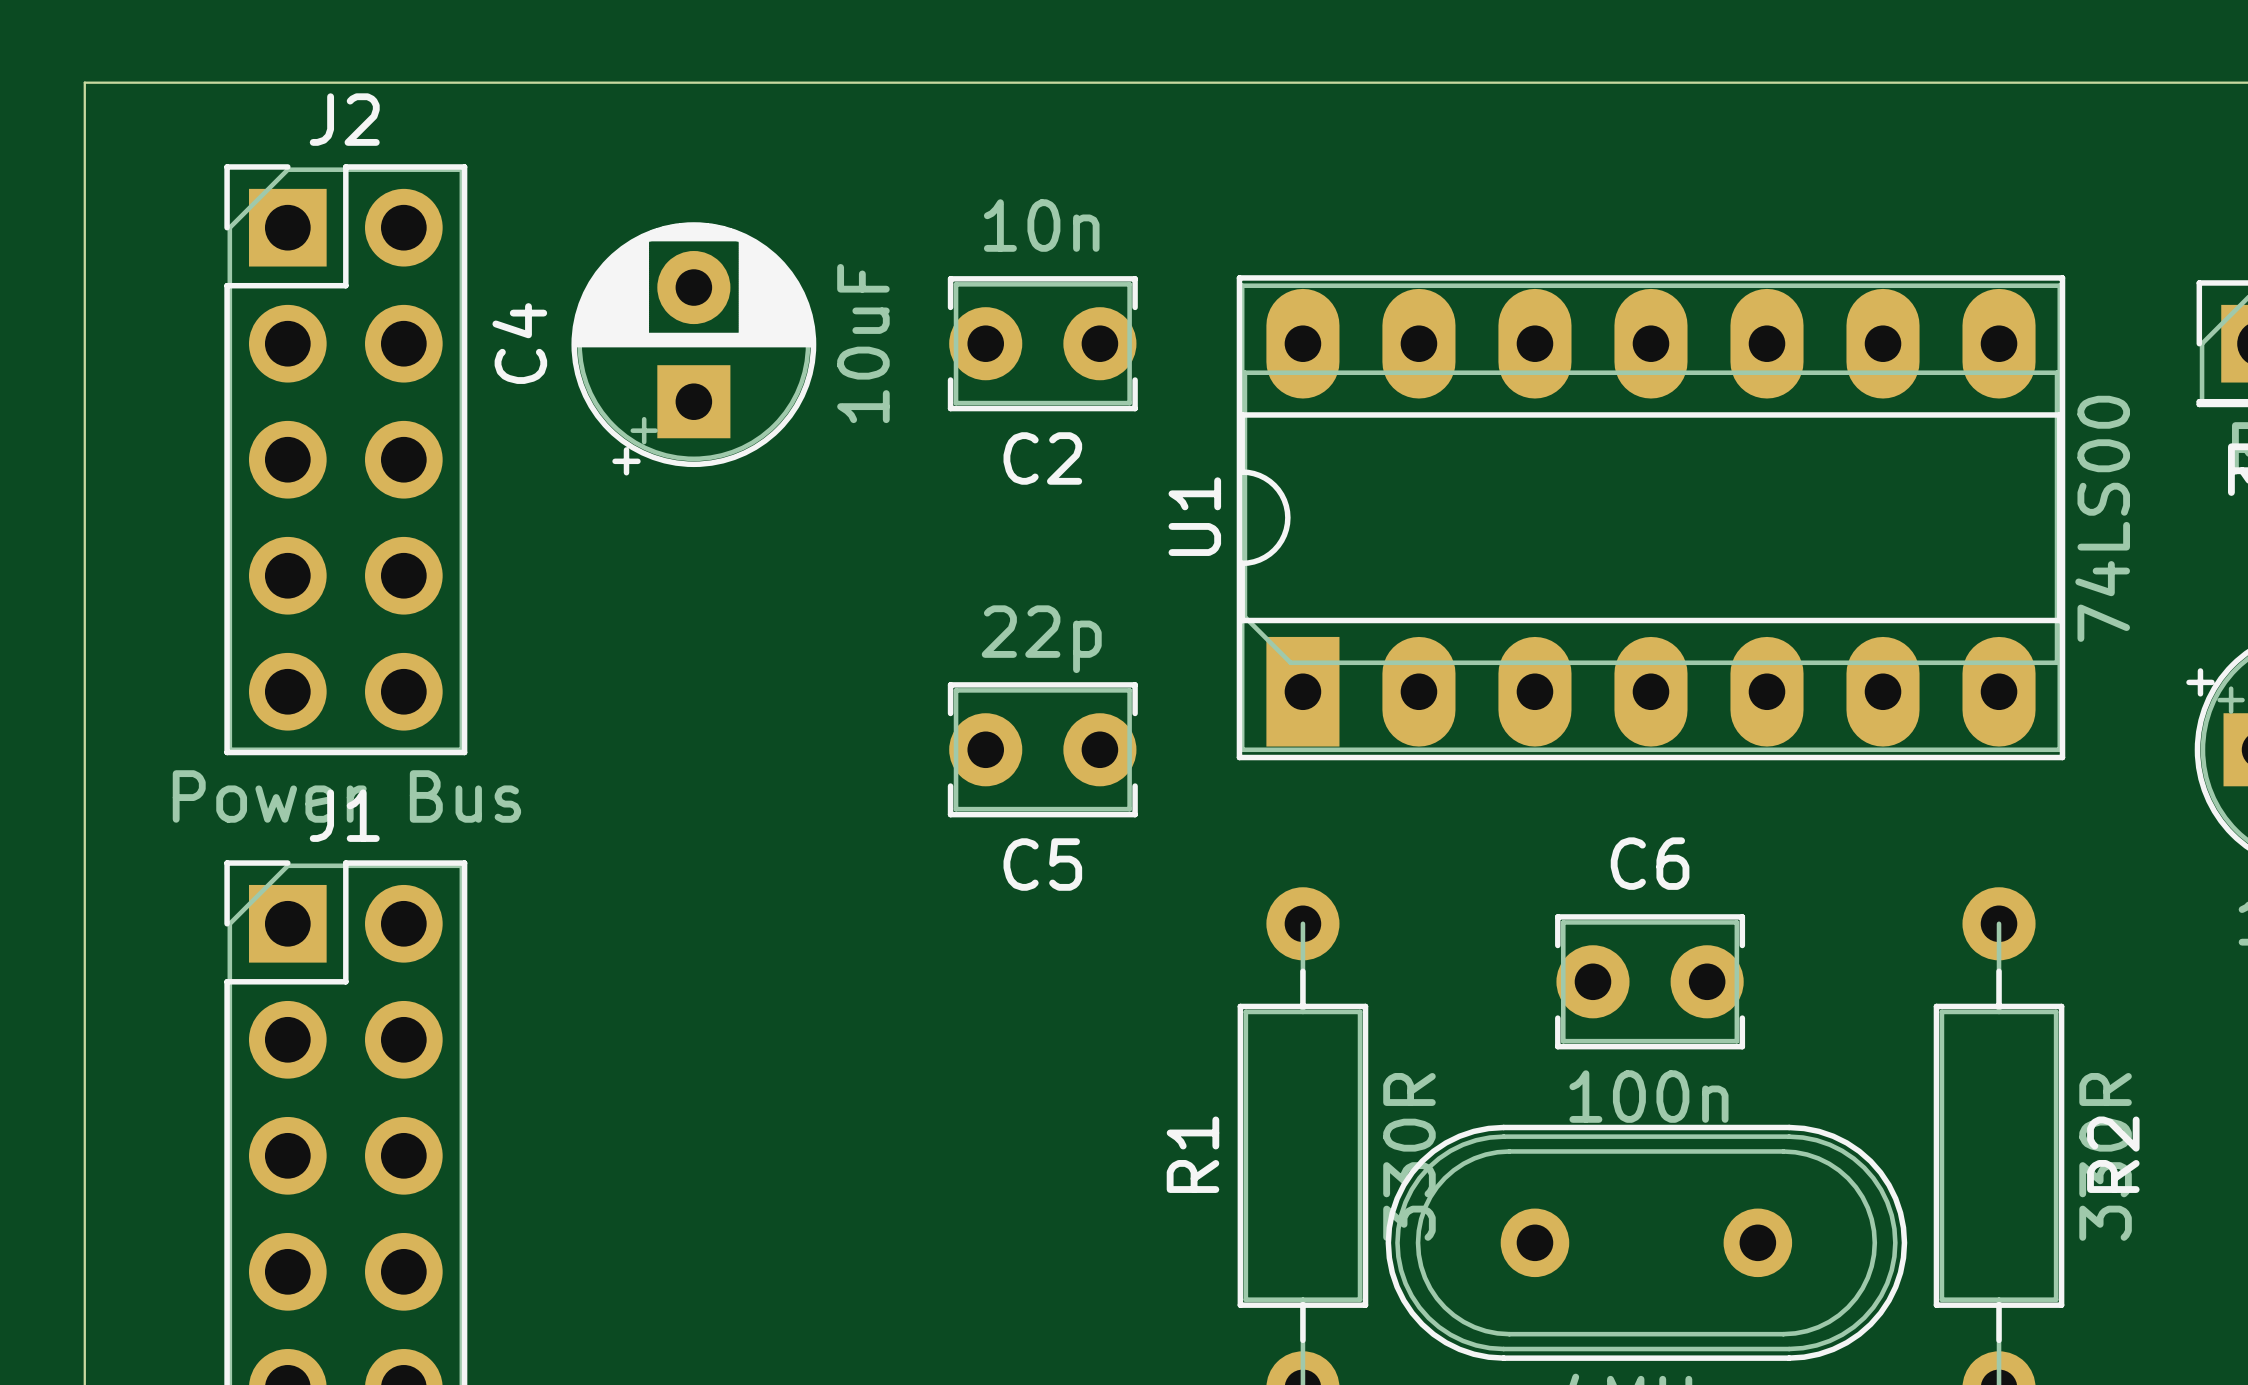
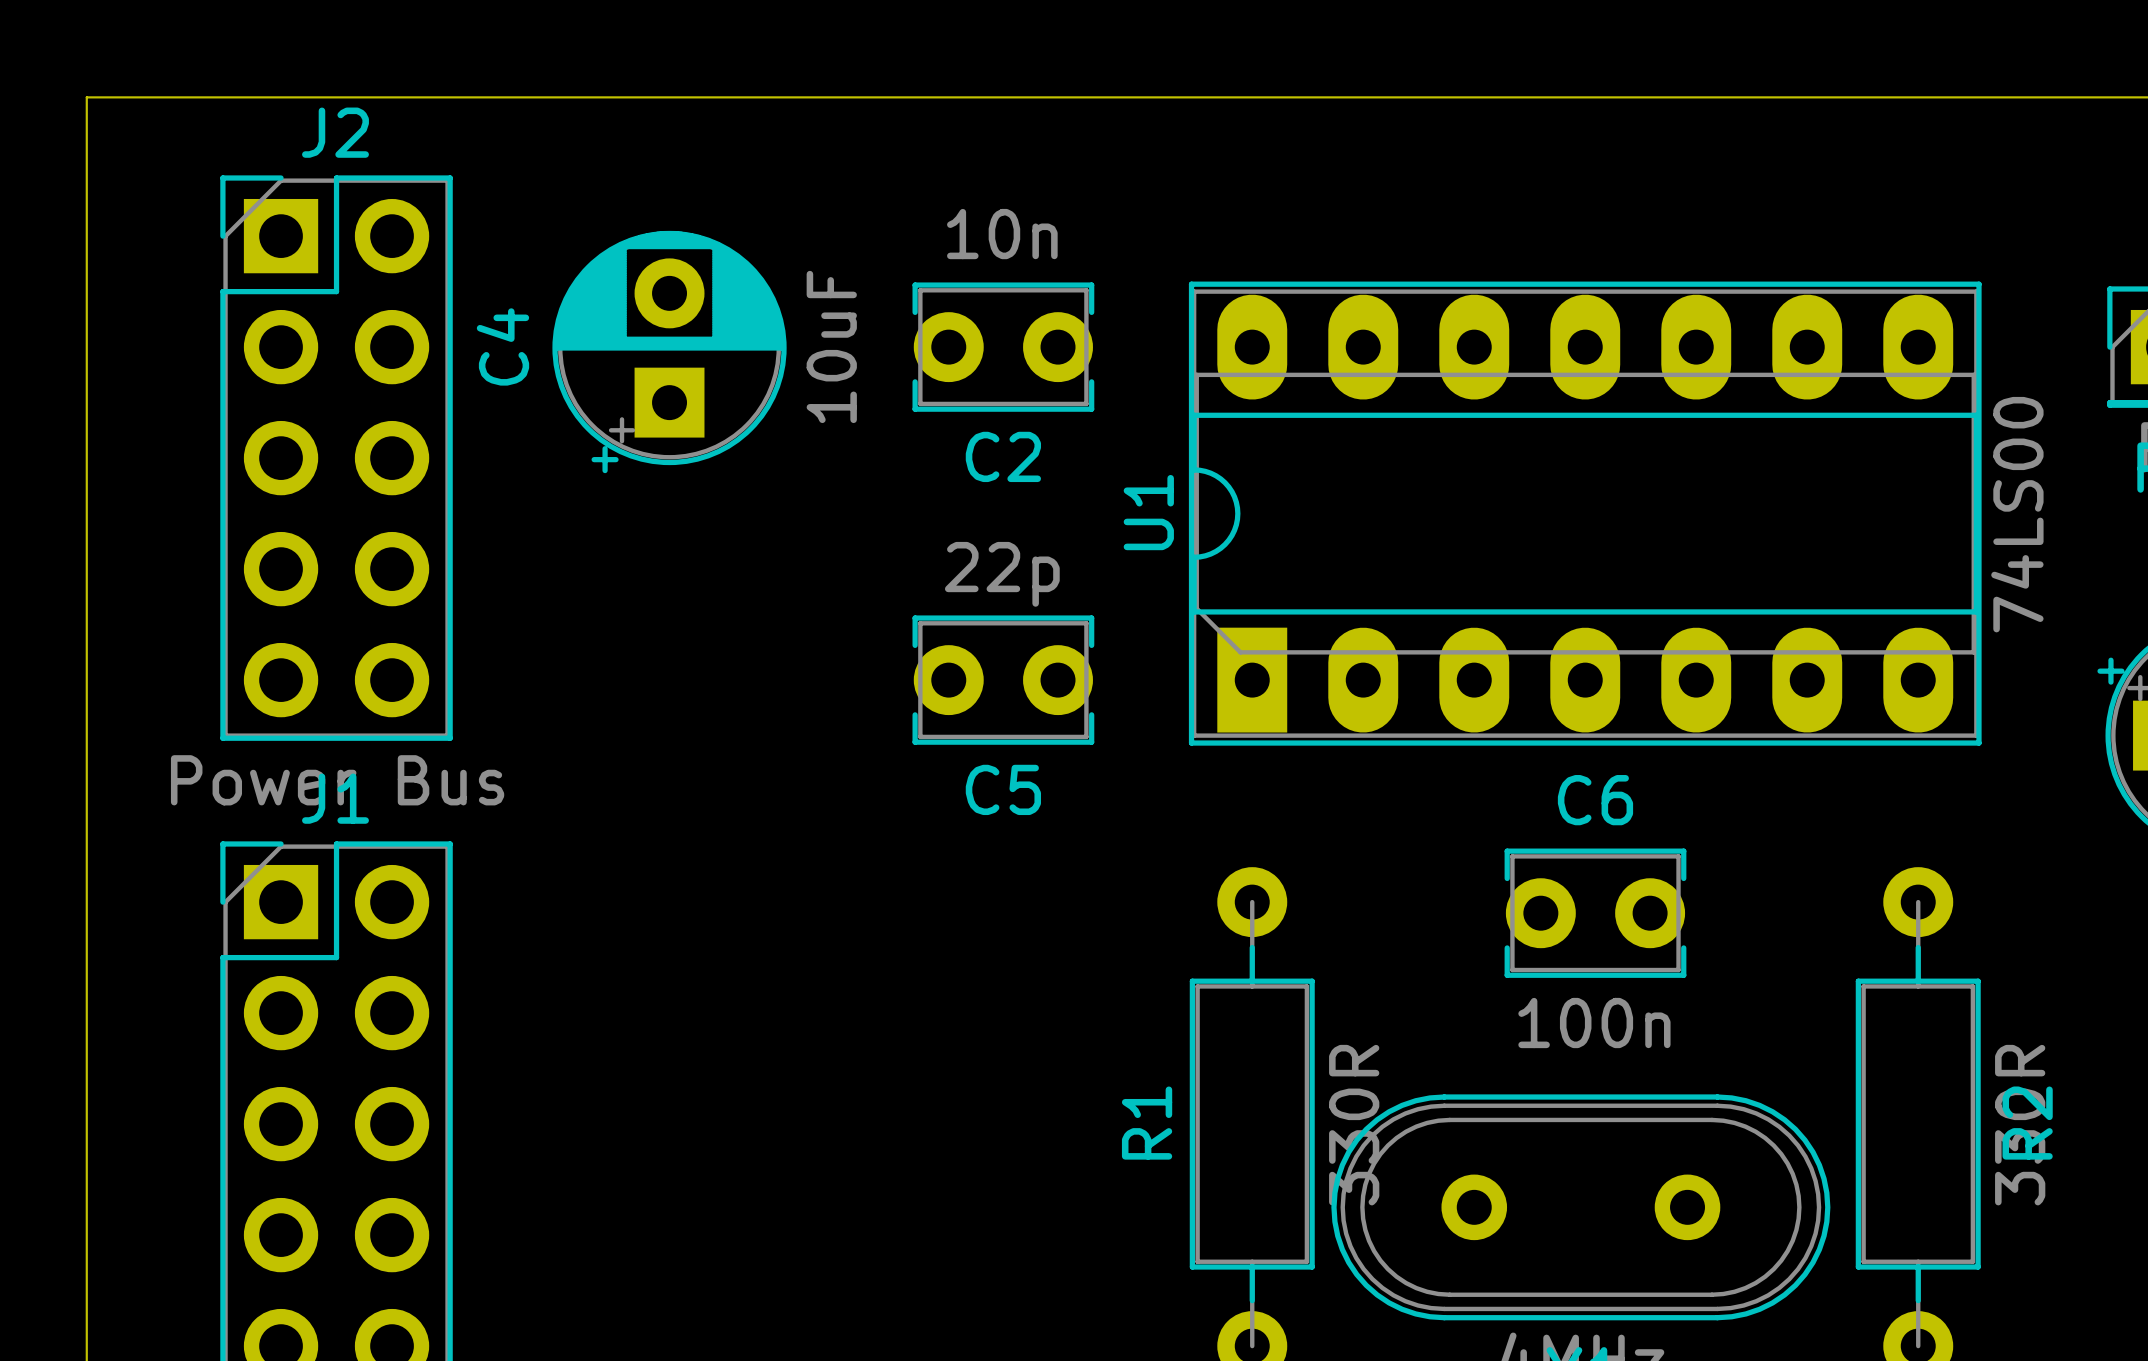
C5 position: (1042, 749) -> (1003, 680)
C6 position: (1650, 981) -> (1595, 913)

